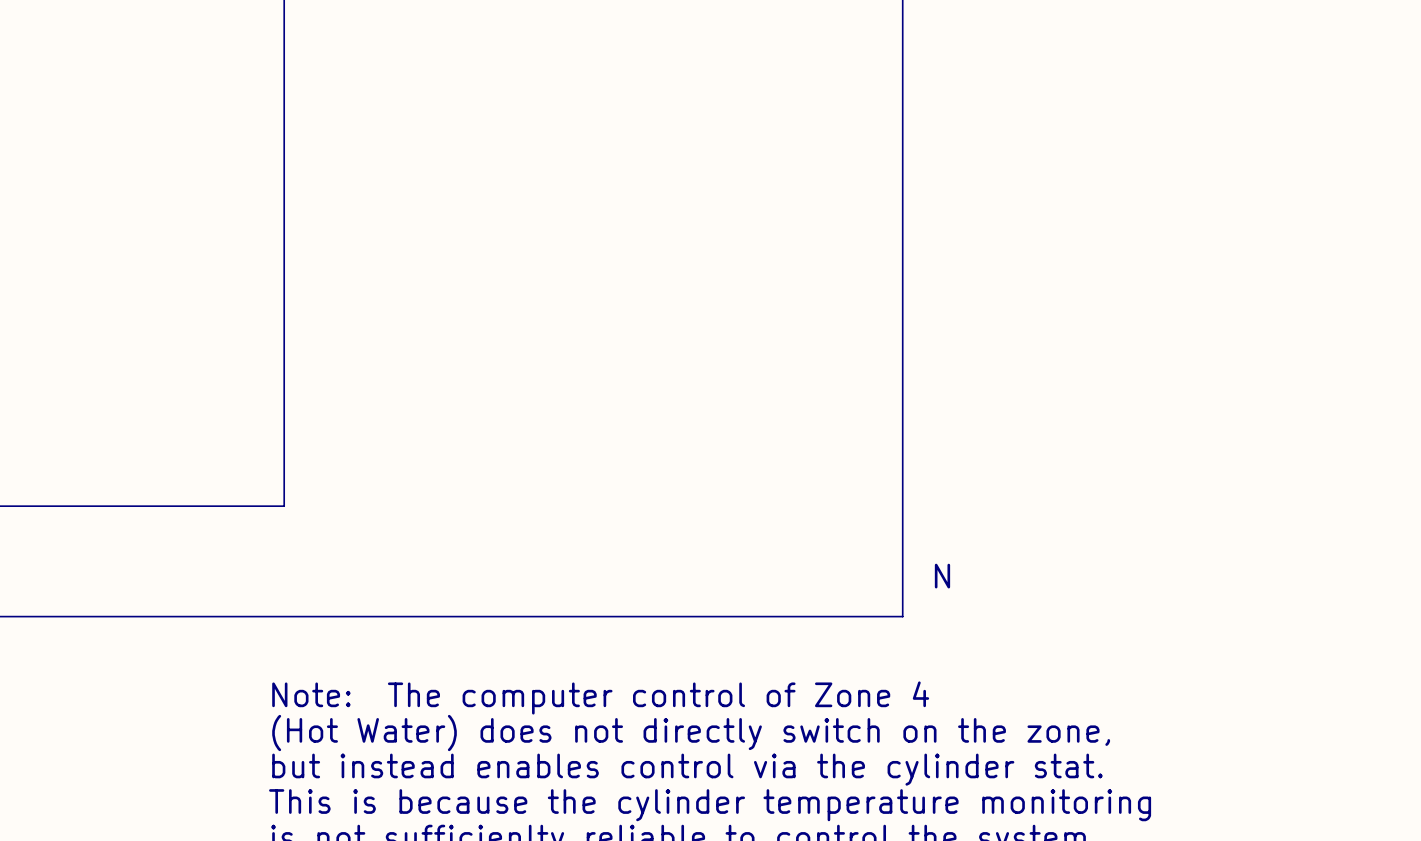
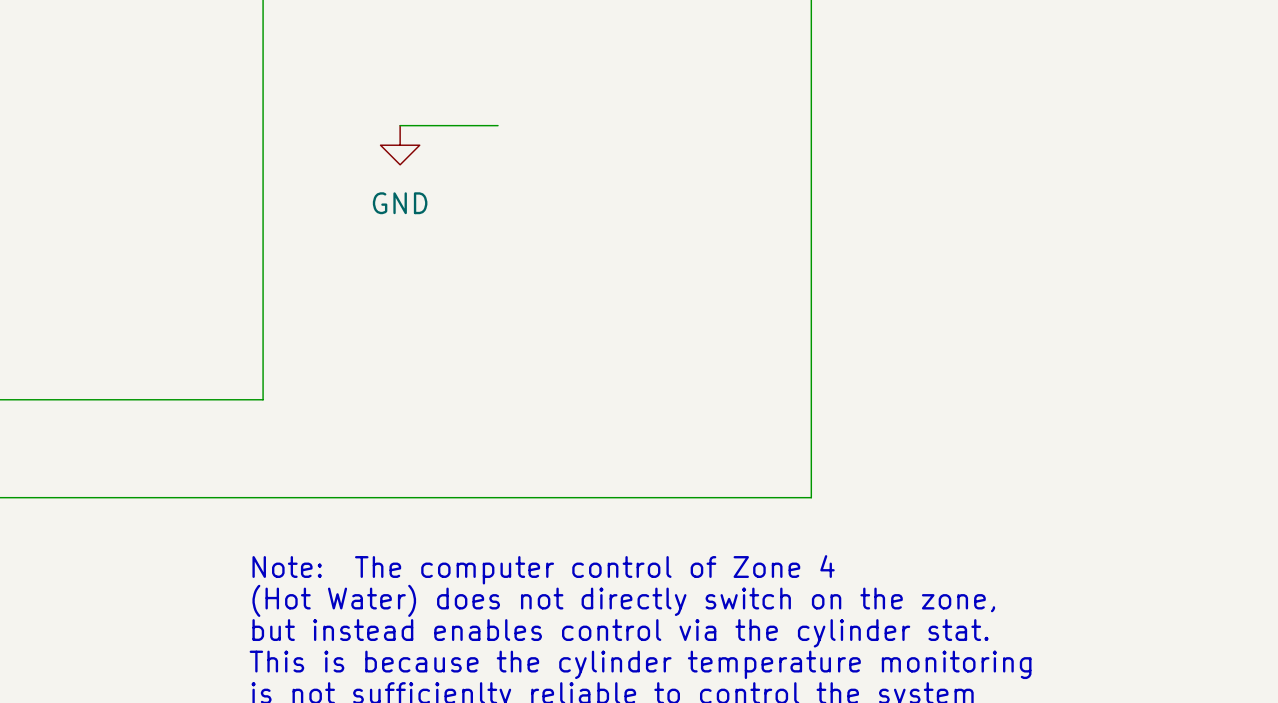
wire: none -> (400, 125) (498, 125)
power symbol: none -> GND (400, 145)
text: N (942, 576) -> none

